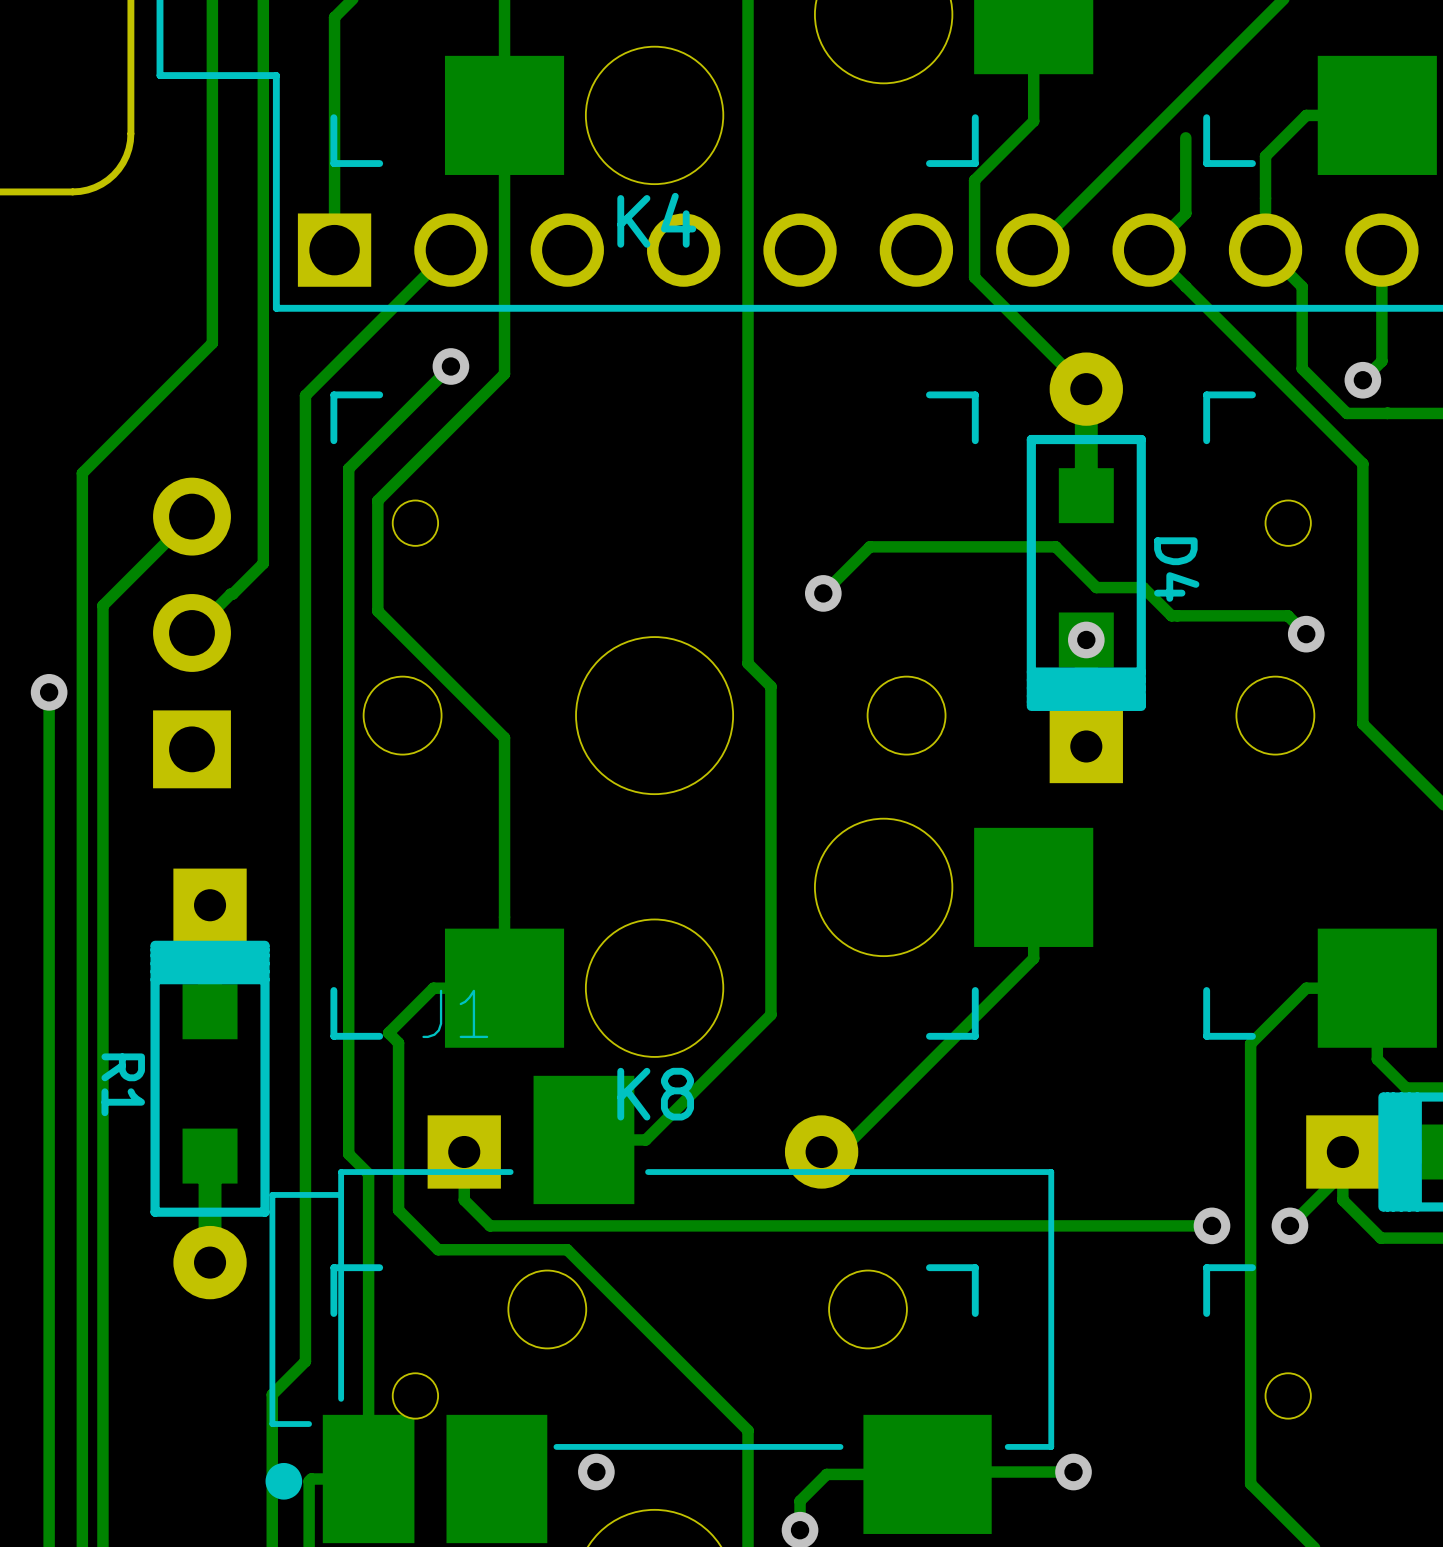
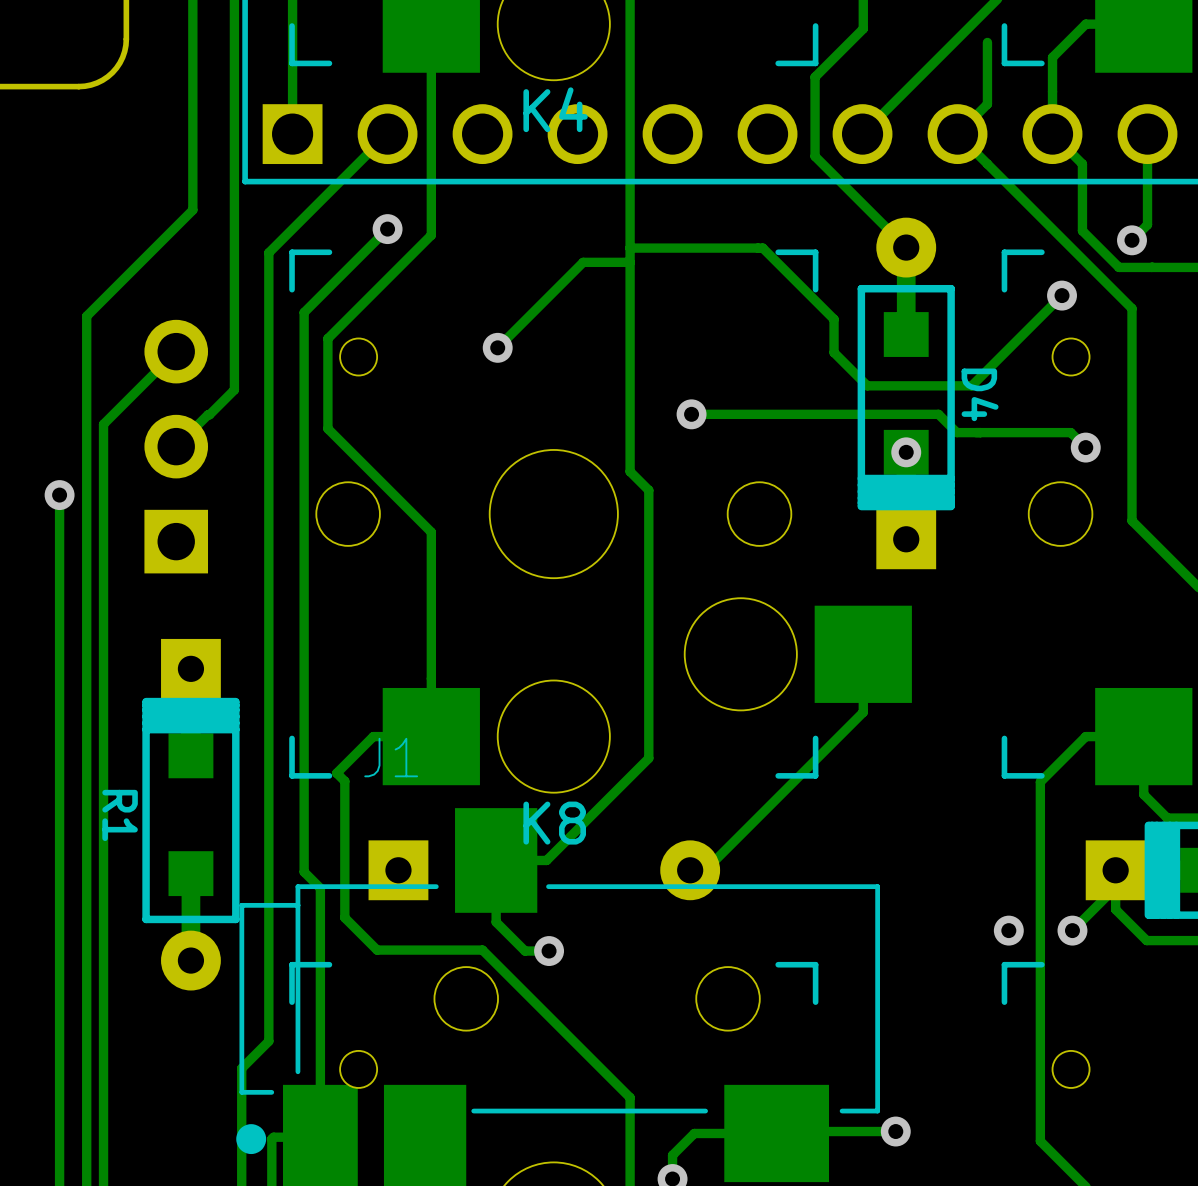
track: none -> (630, 248) (762, 248) (834, 319) (834, 352) (867, 385) (971, 385) (1062, 295)
track: none -> (630, 262) (583, 262) (497, 347)
via: none -> (1062, 295)
via: none -> (497, 347)
track: (823, 593) (869, 546) (1055, 546) (1096, 587) (1143, 587) (1171, 615) -> (691, 414) (938, 414) (956, 432) (975, 432)
track: none -> (496, 860) (496, 922) (525, 951) (549, 951)
track: (464, 1151) (464, 1200) (490, 1225) (1211, 1225) -> none
via position: (596, 1472) -> (549, 951)

